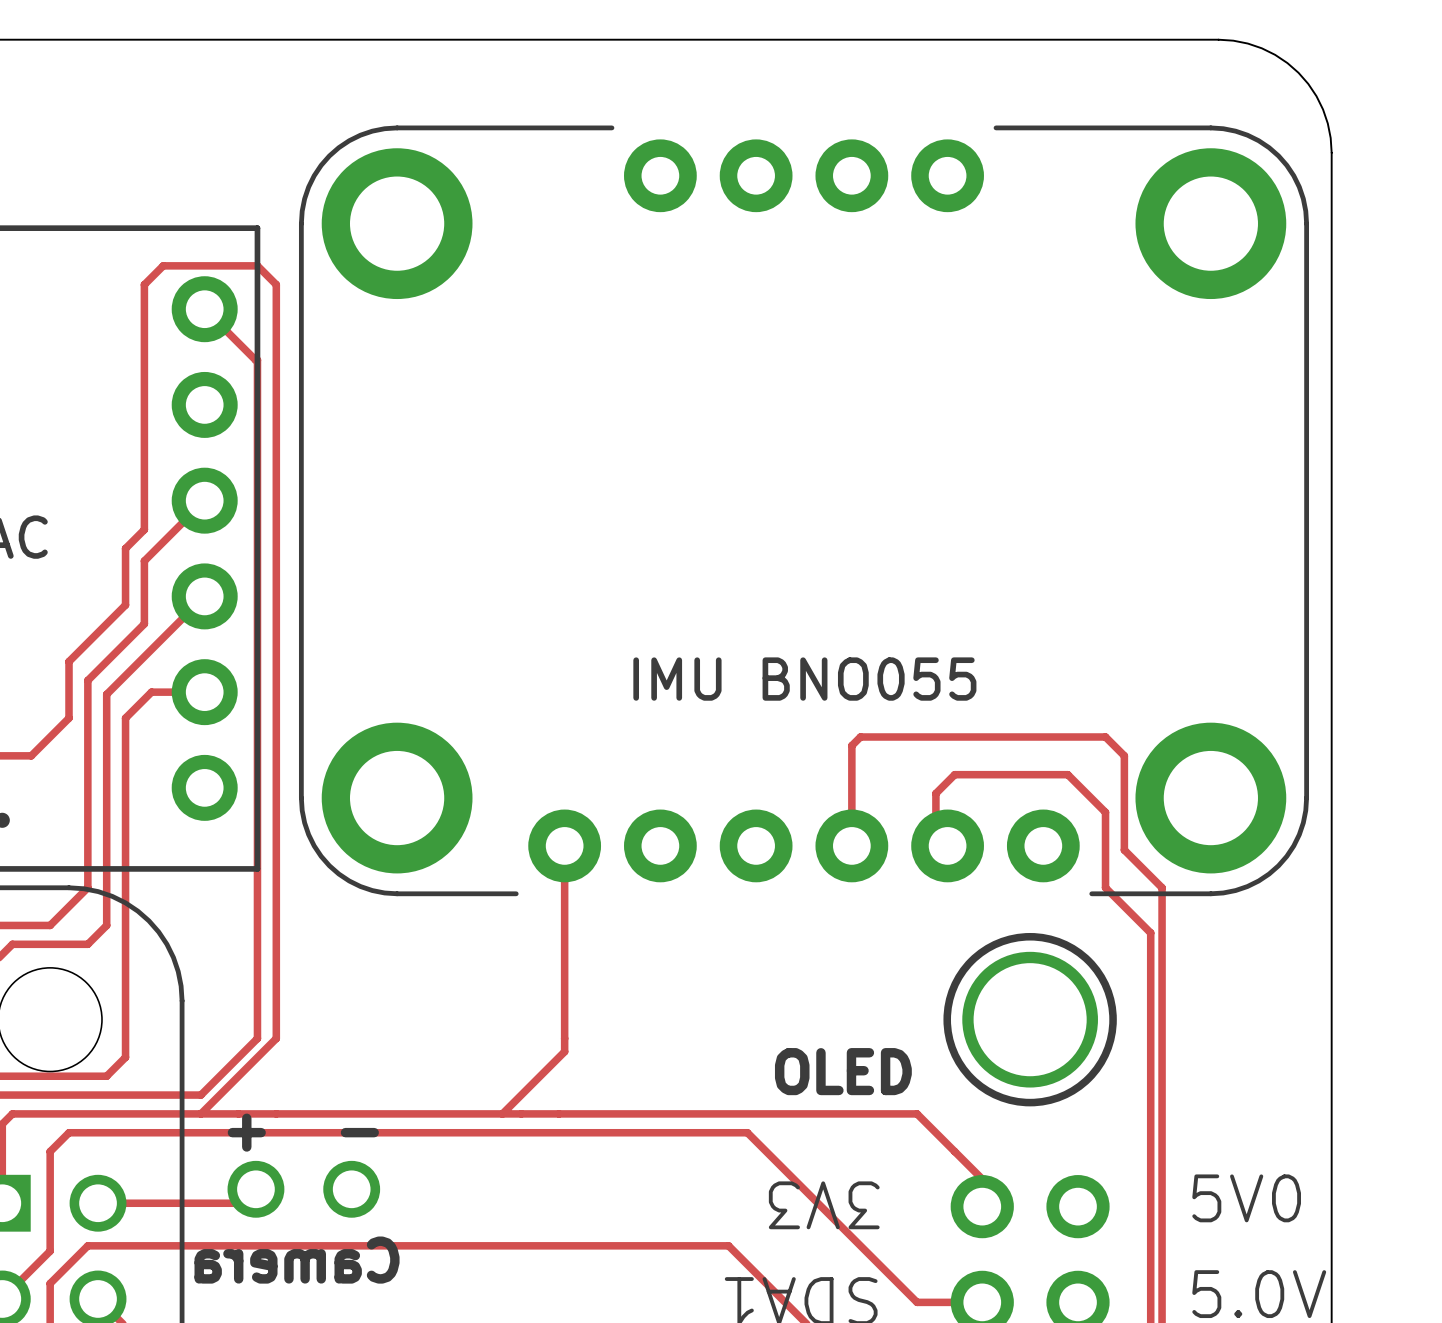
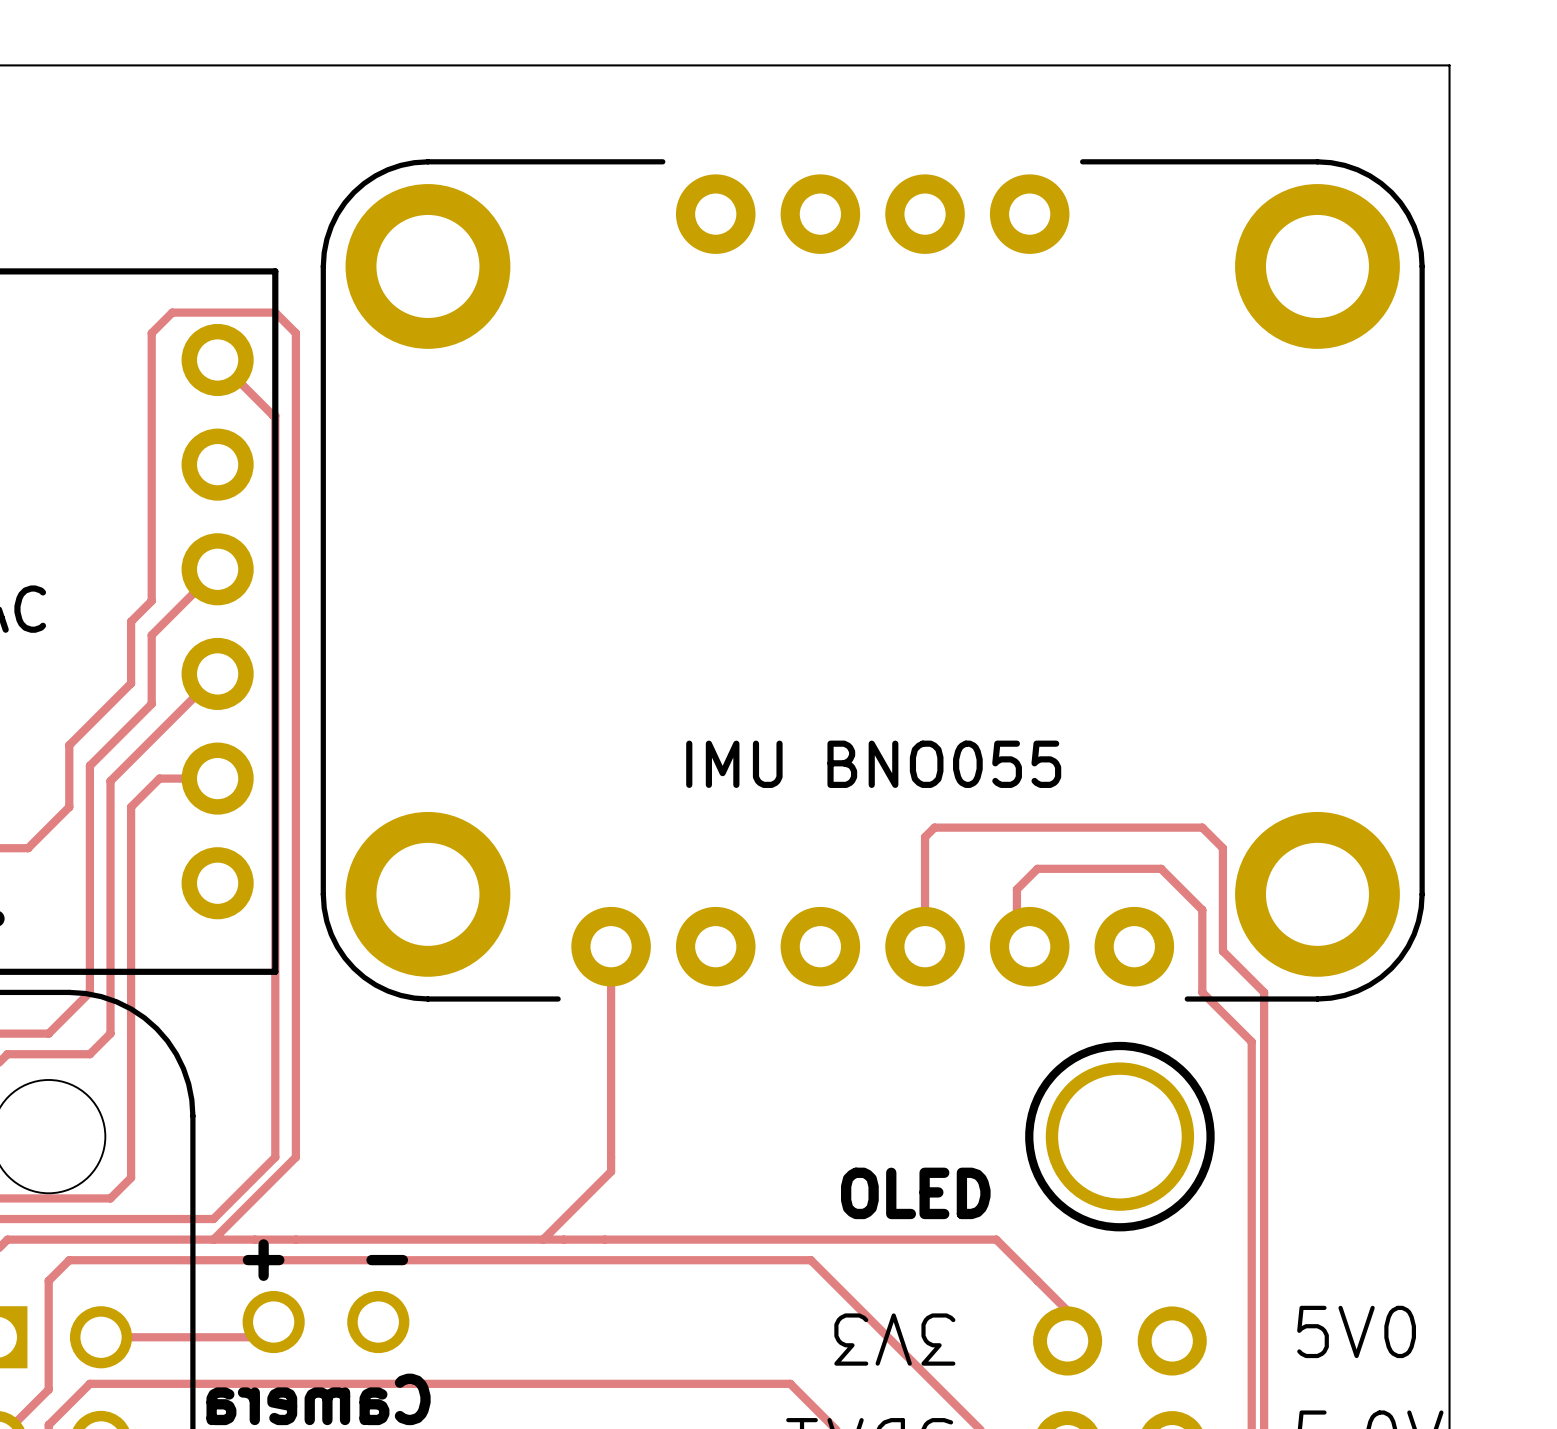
board edge: (1218, 39) (1247, 43) (1261, 48) (1287, 63) (1298, 72) (1308, 83) (1323, 109) (1327, 123) (1331, 152) -> (1325, 65) (1449, 65) (1449, 189)

